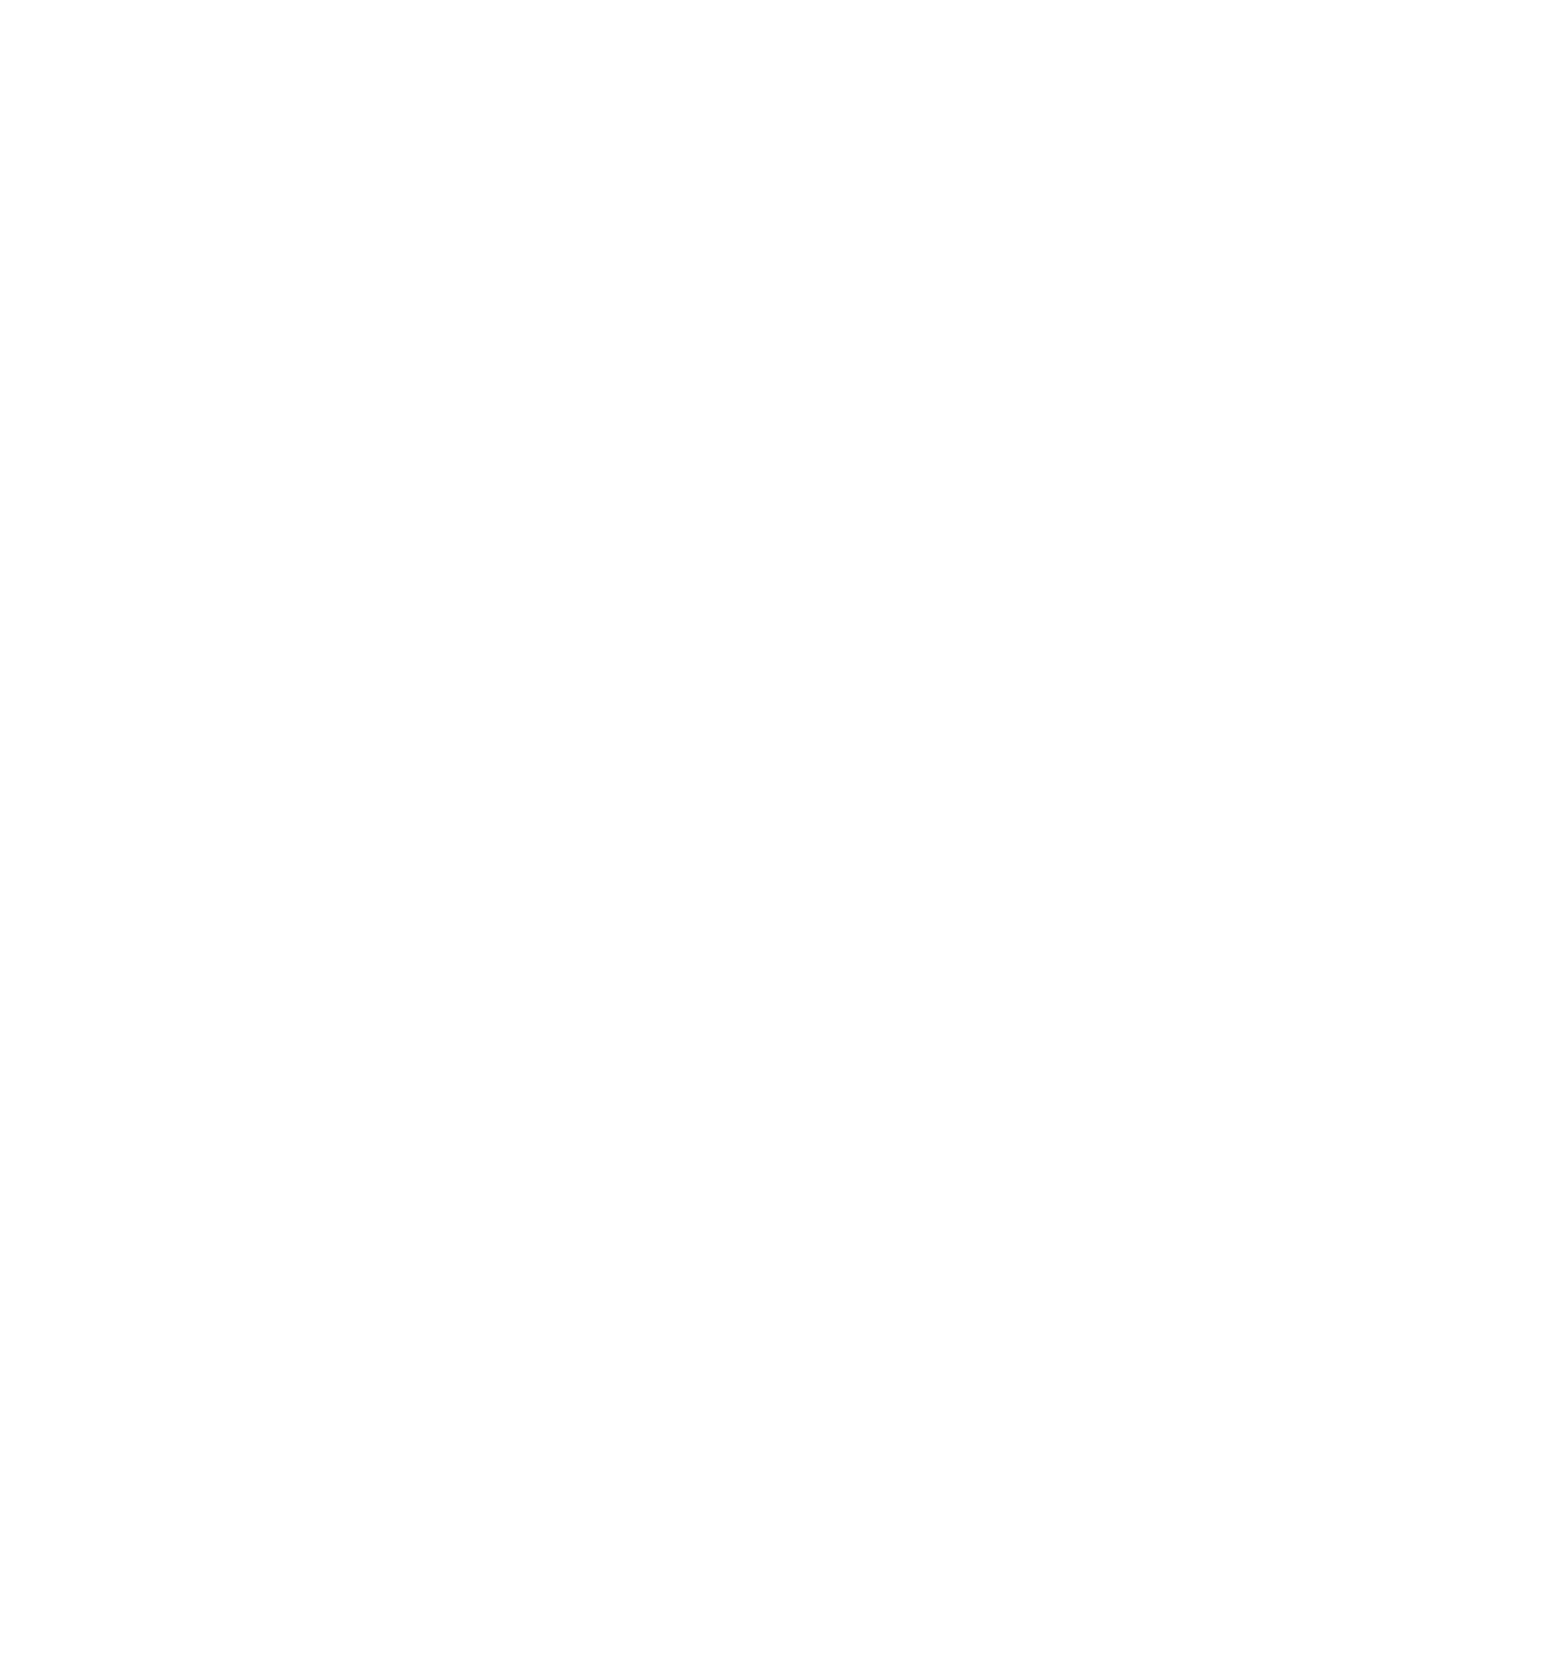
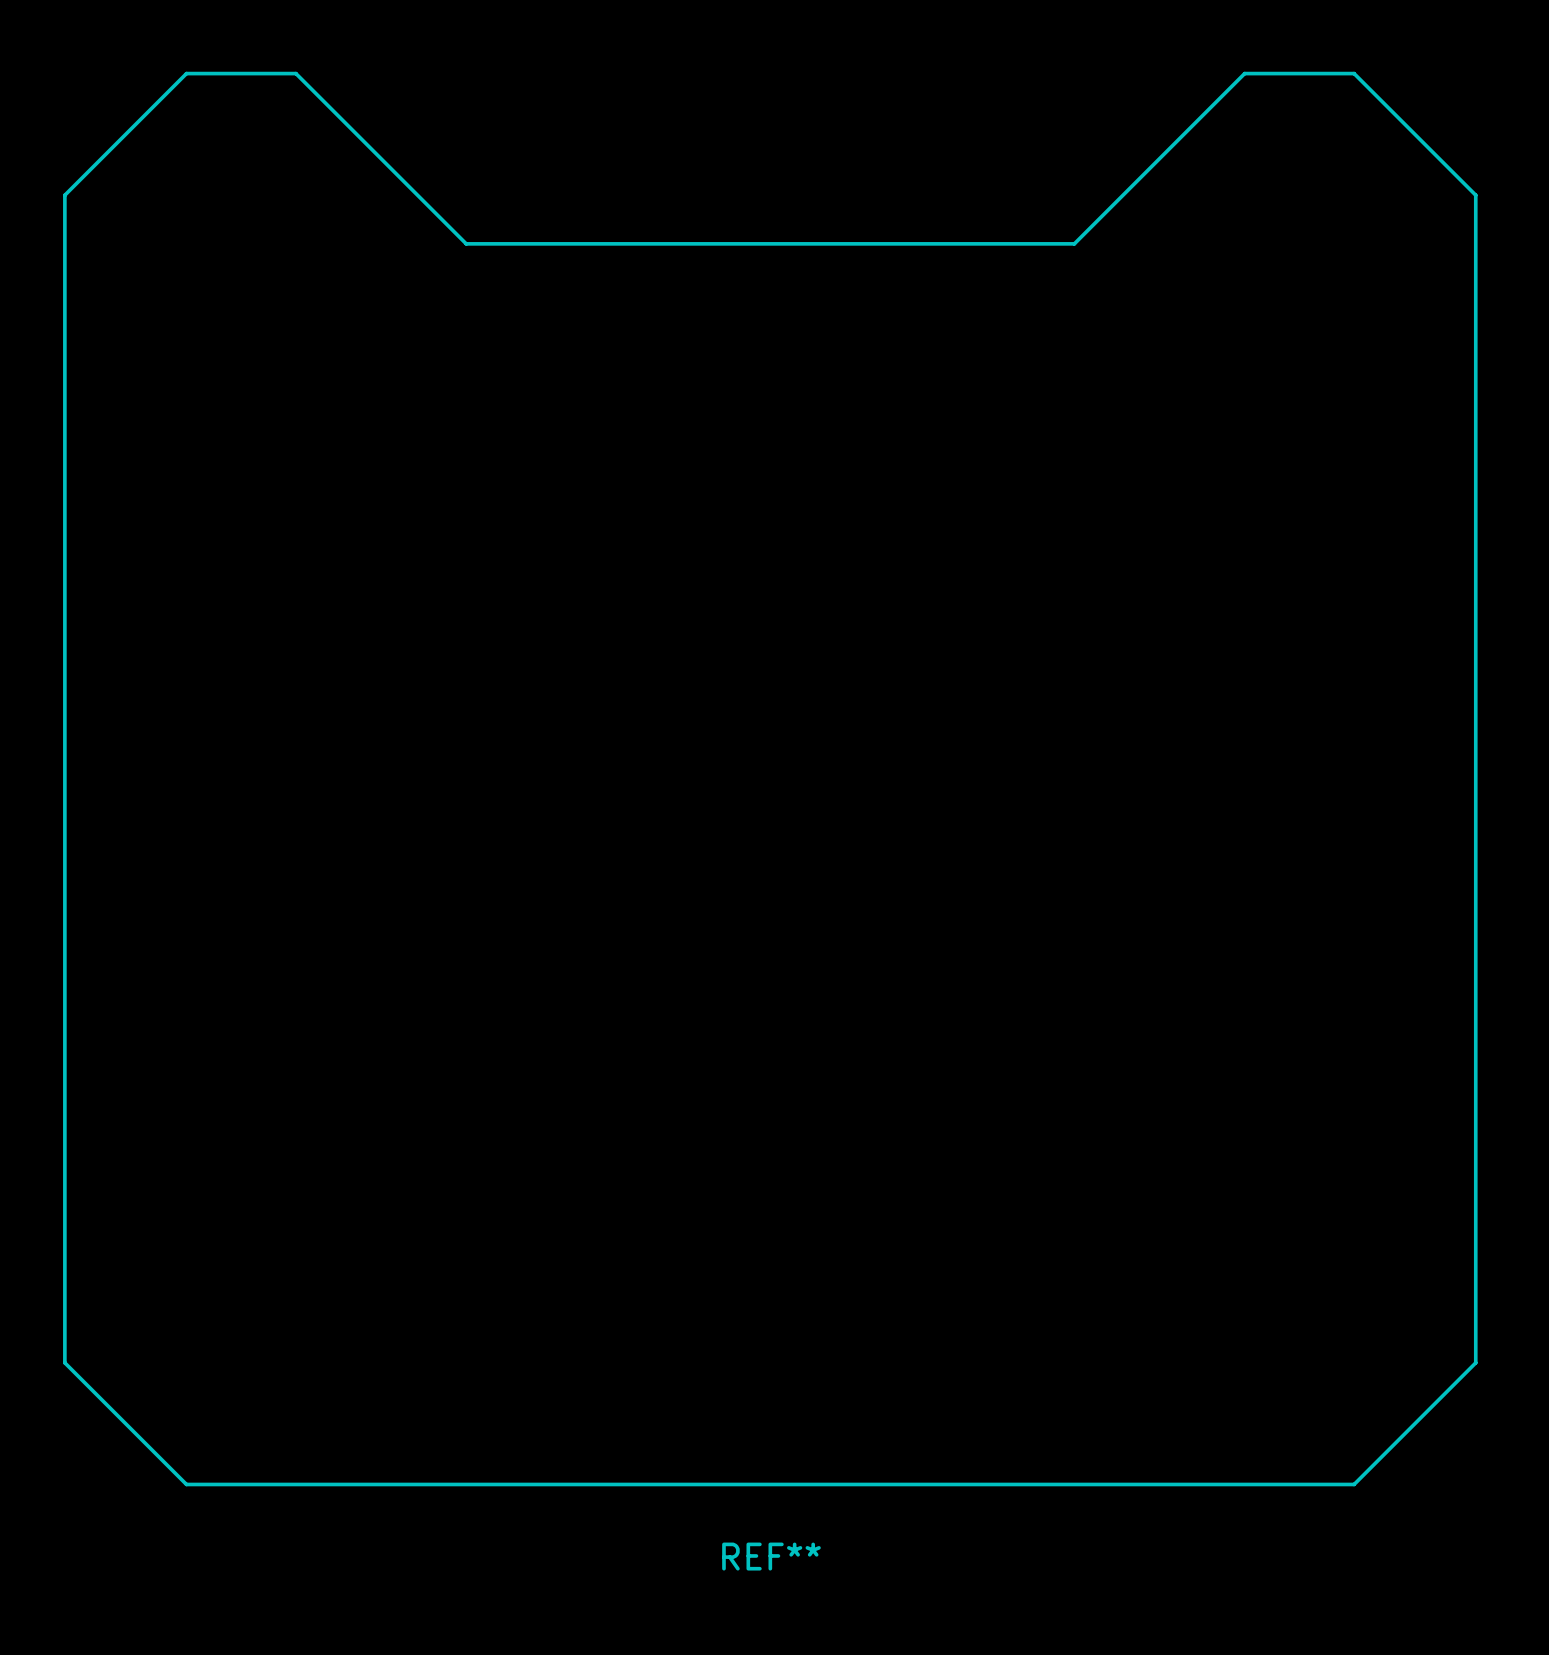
REF**: none -> (770, 779)

